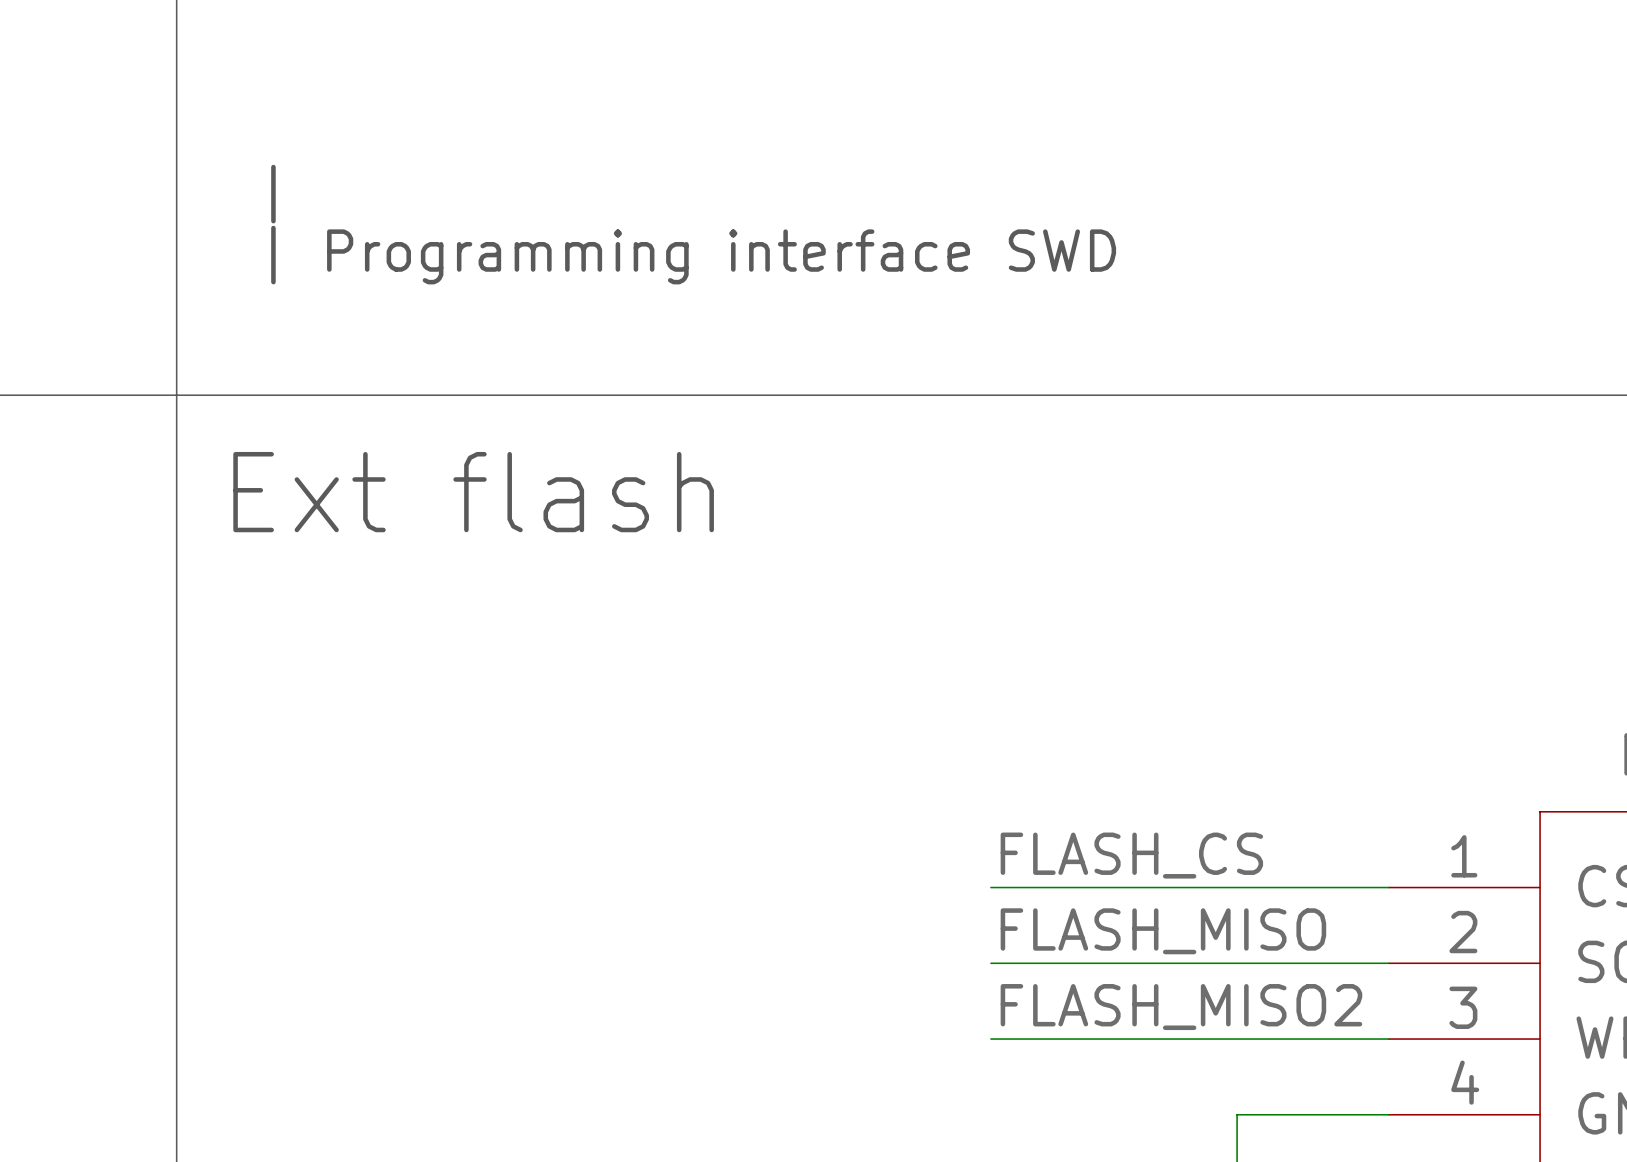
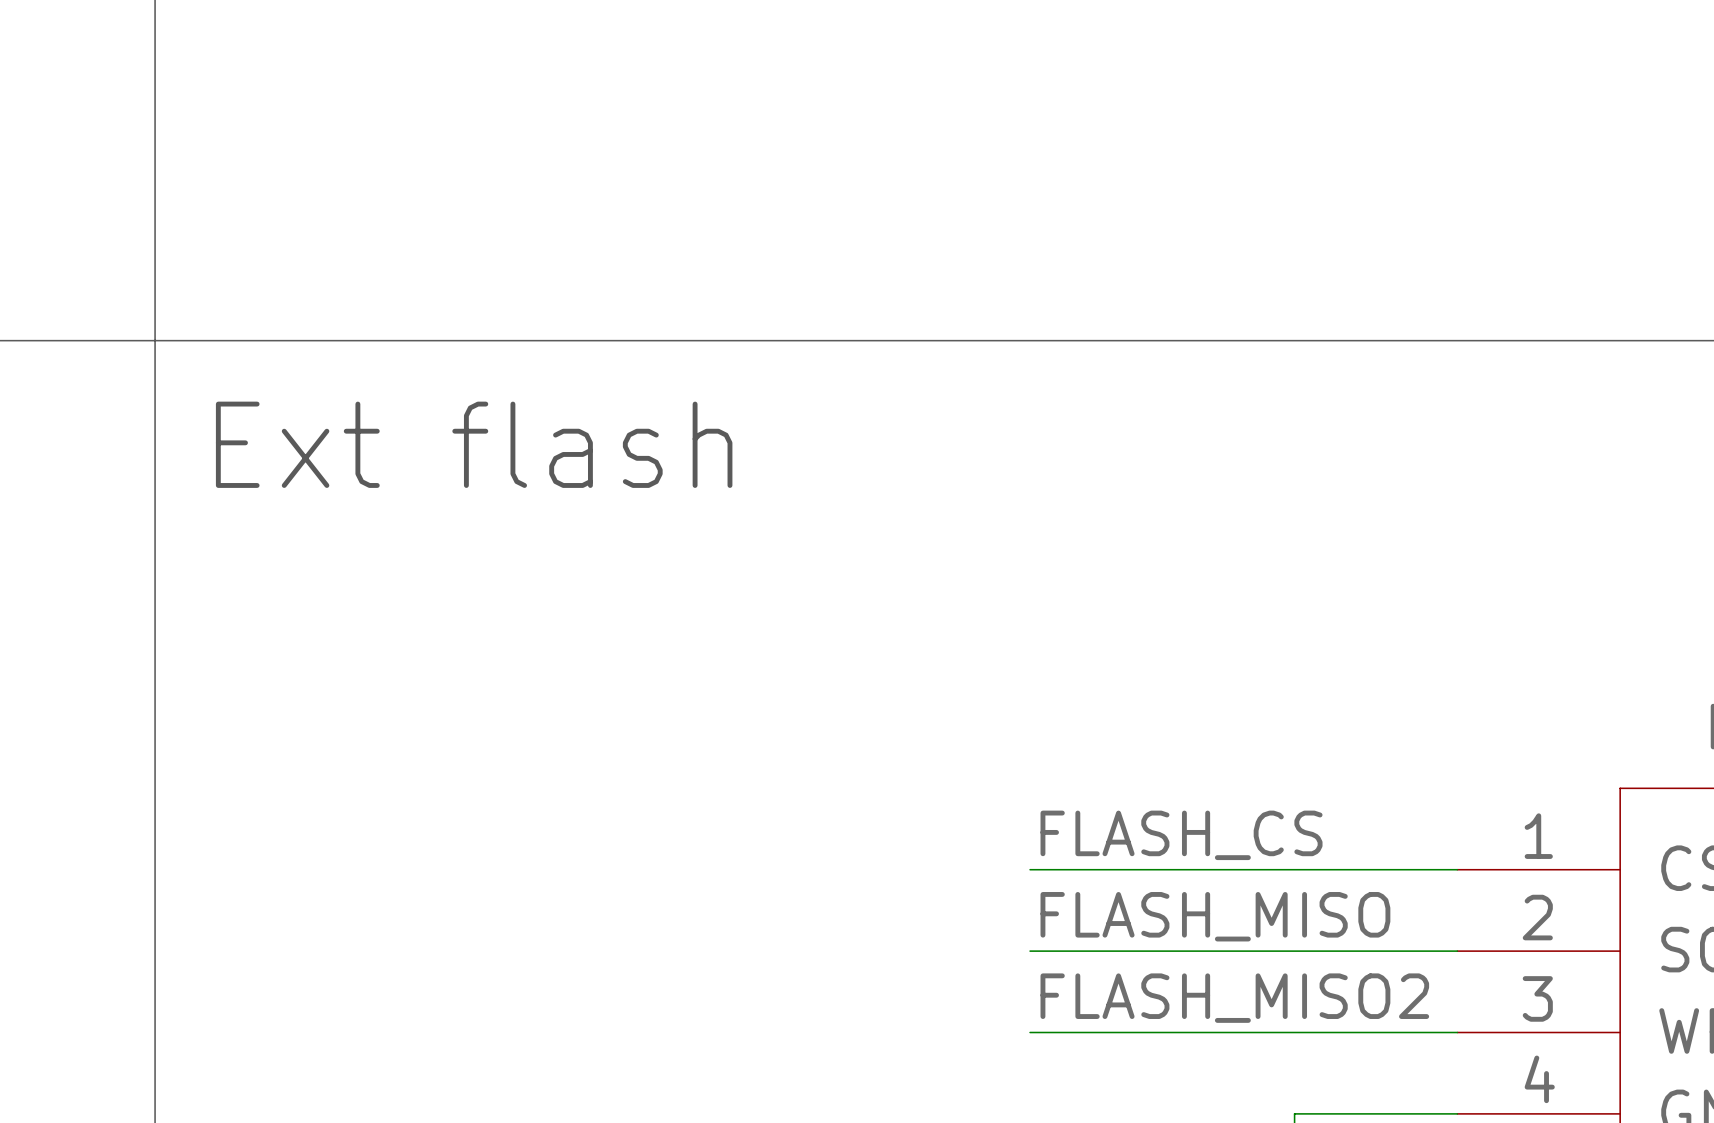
text: | (273, 194) -> none
text: | Programming interface SWD (693, 255) -> none

